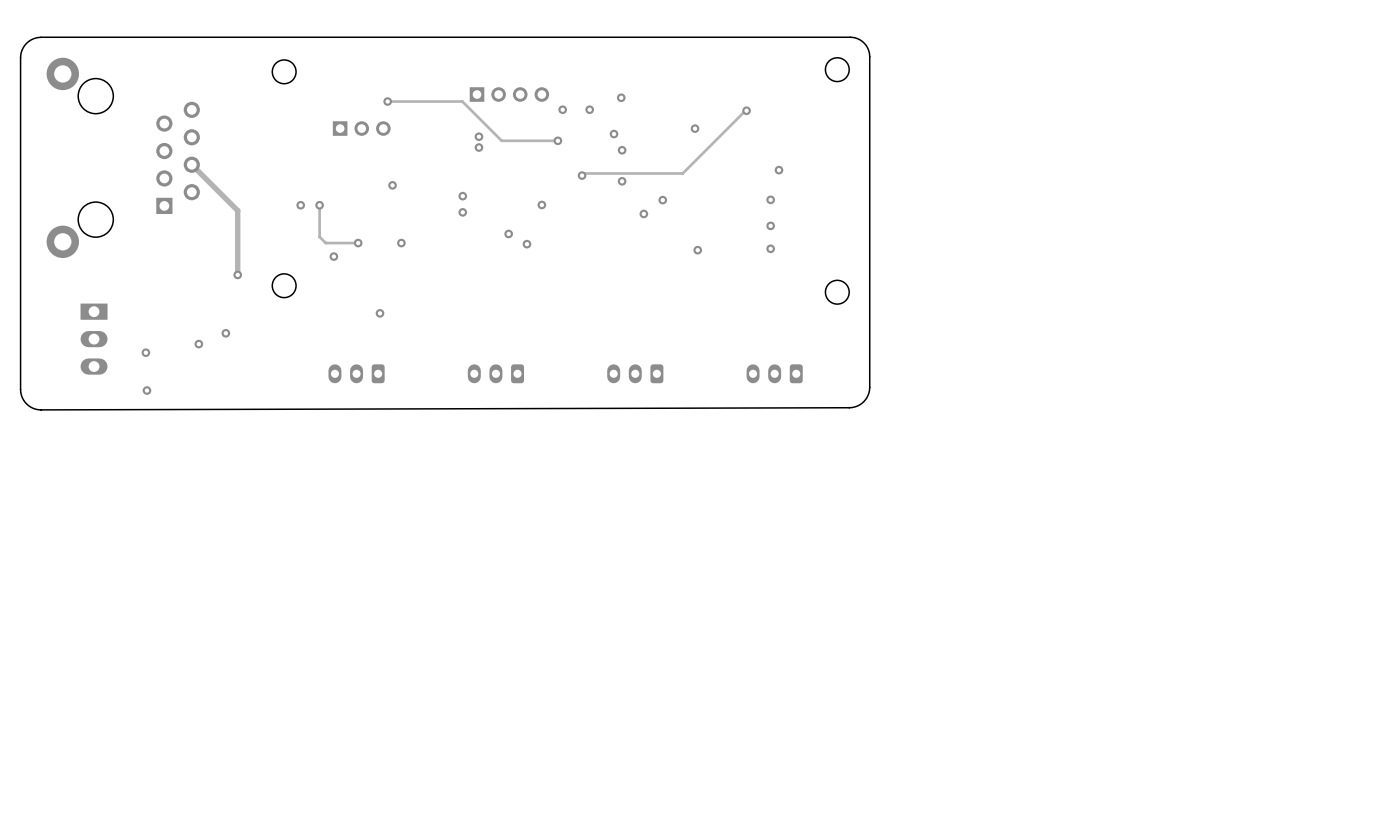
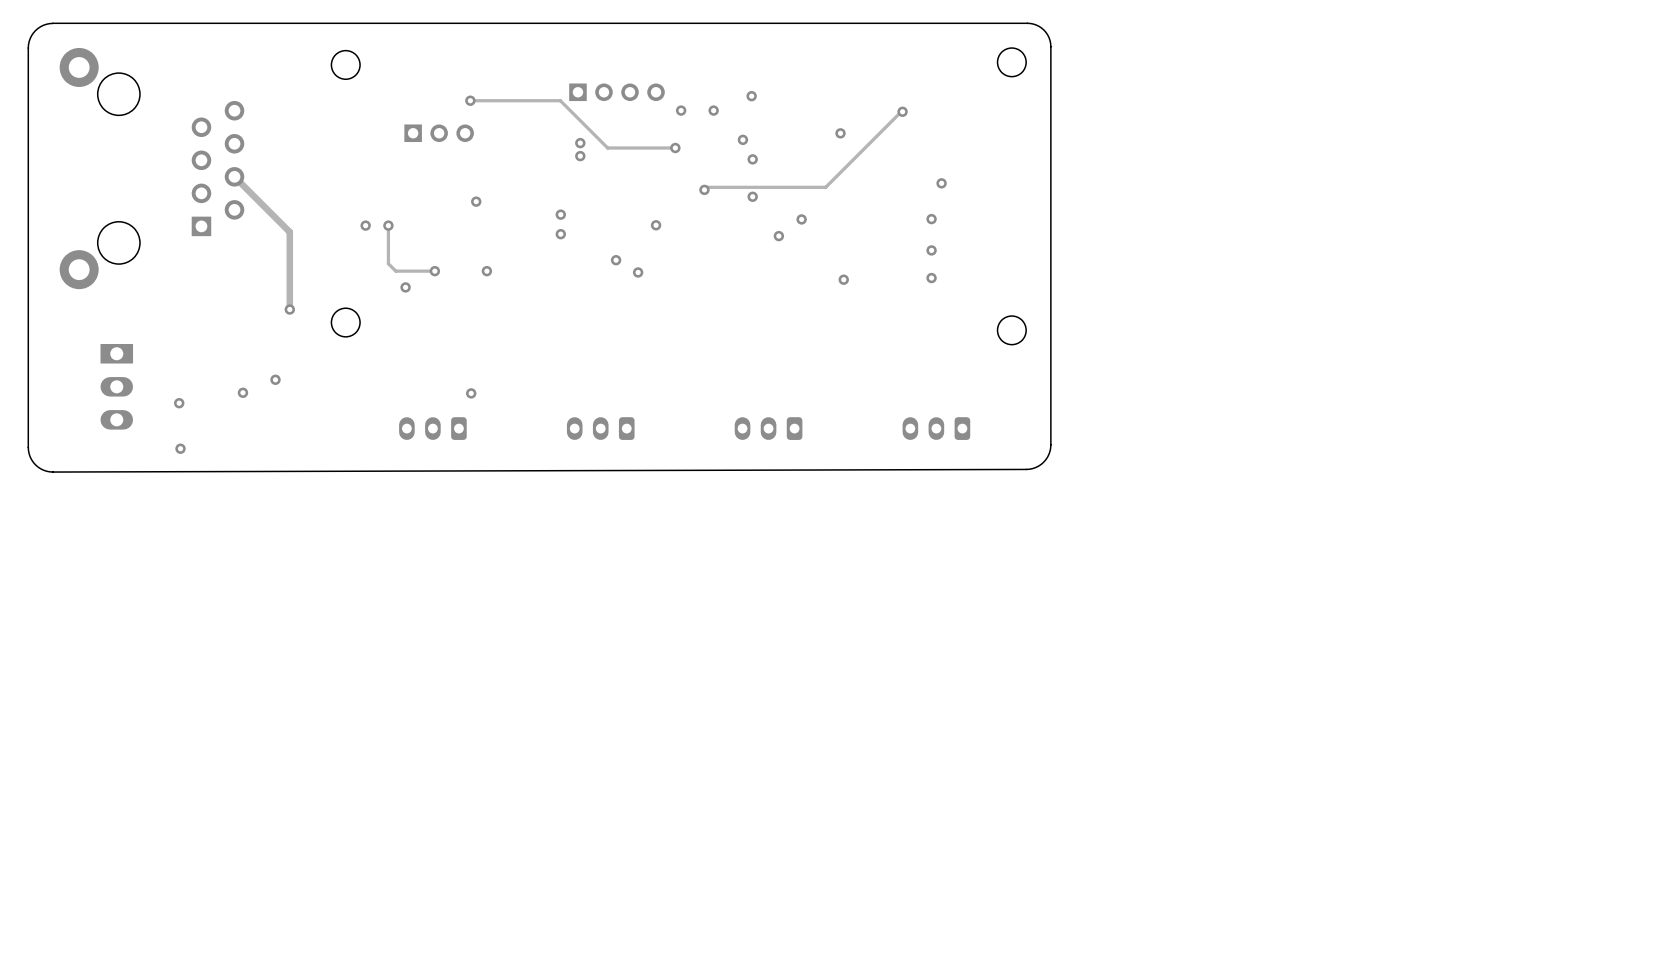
via position: (379, 313) -> (471, 393)

